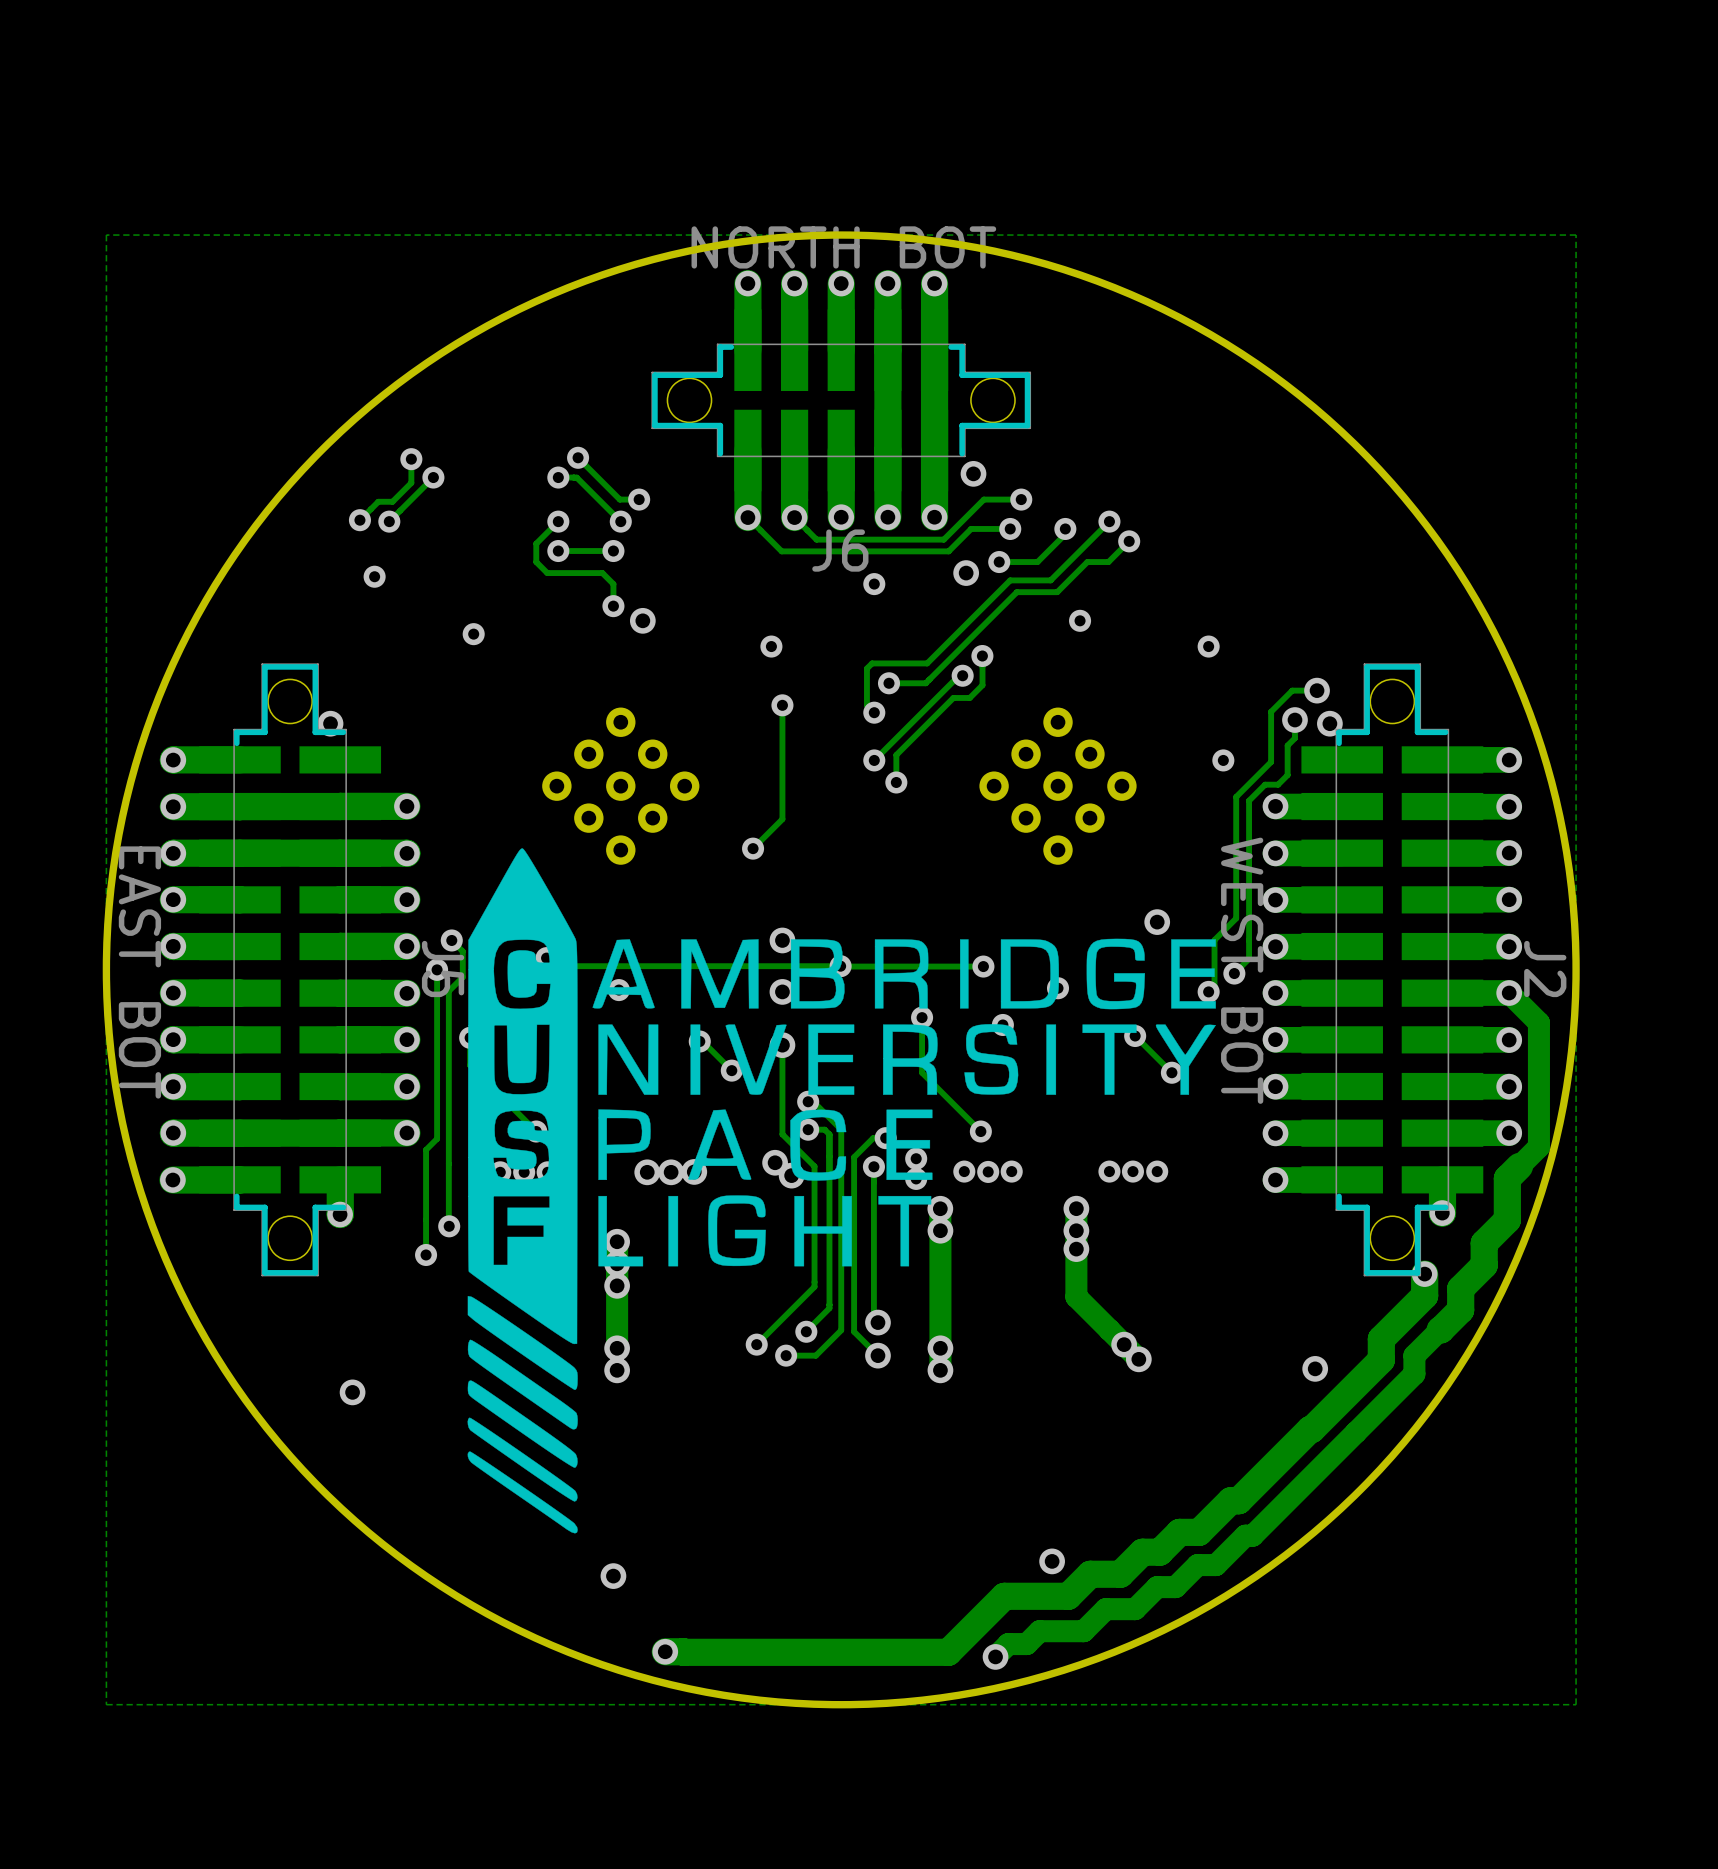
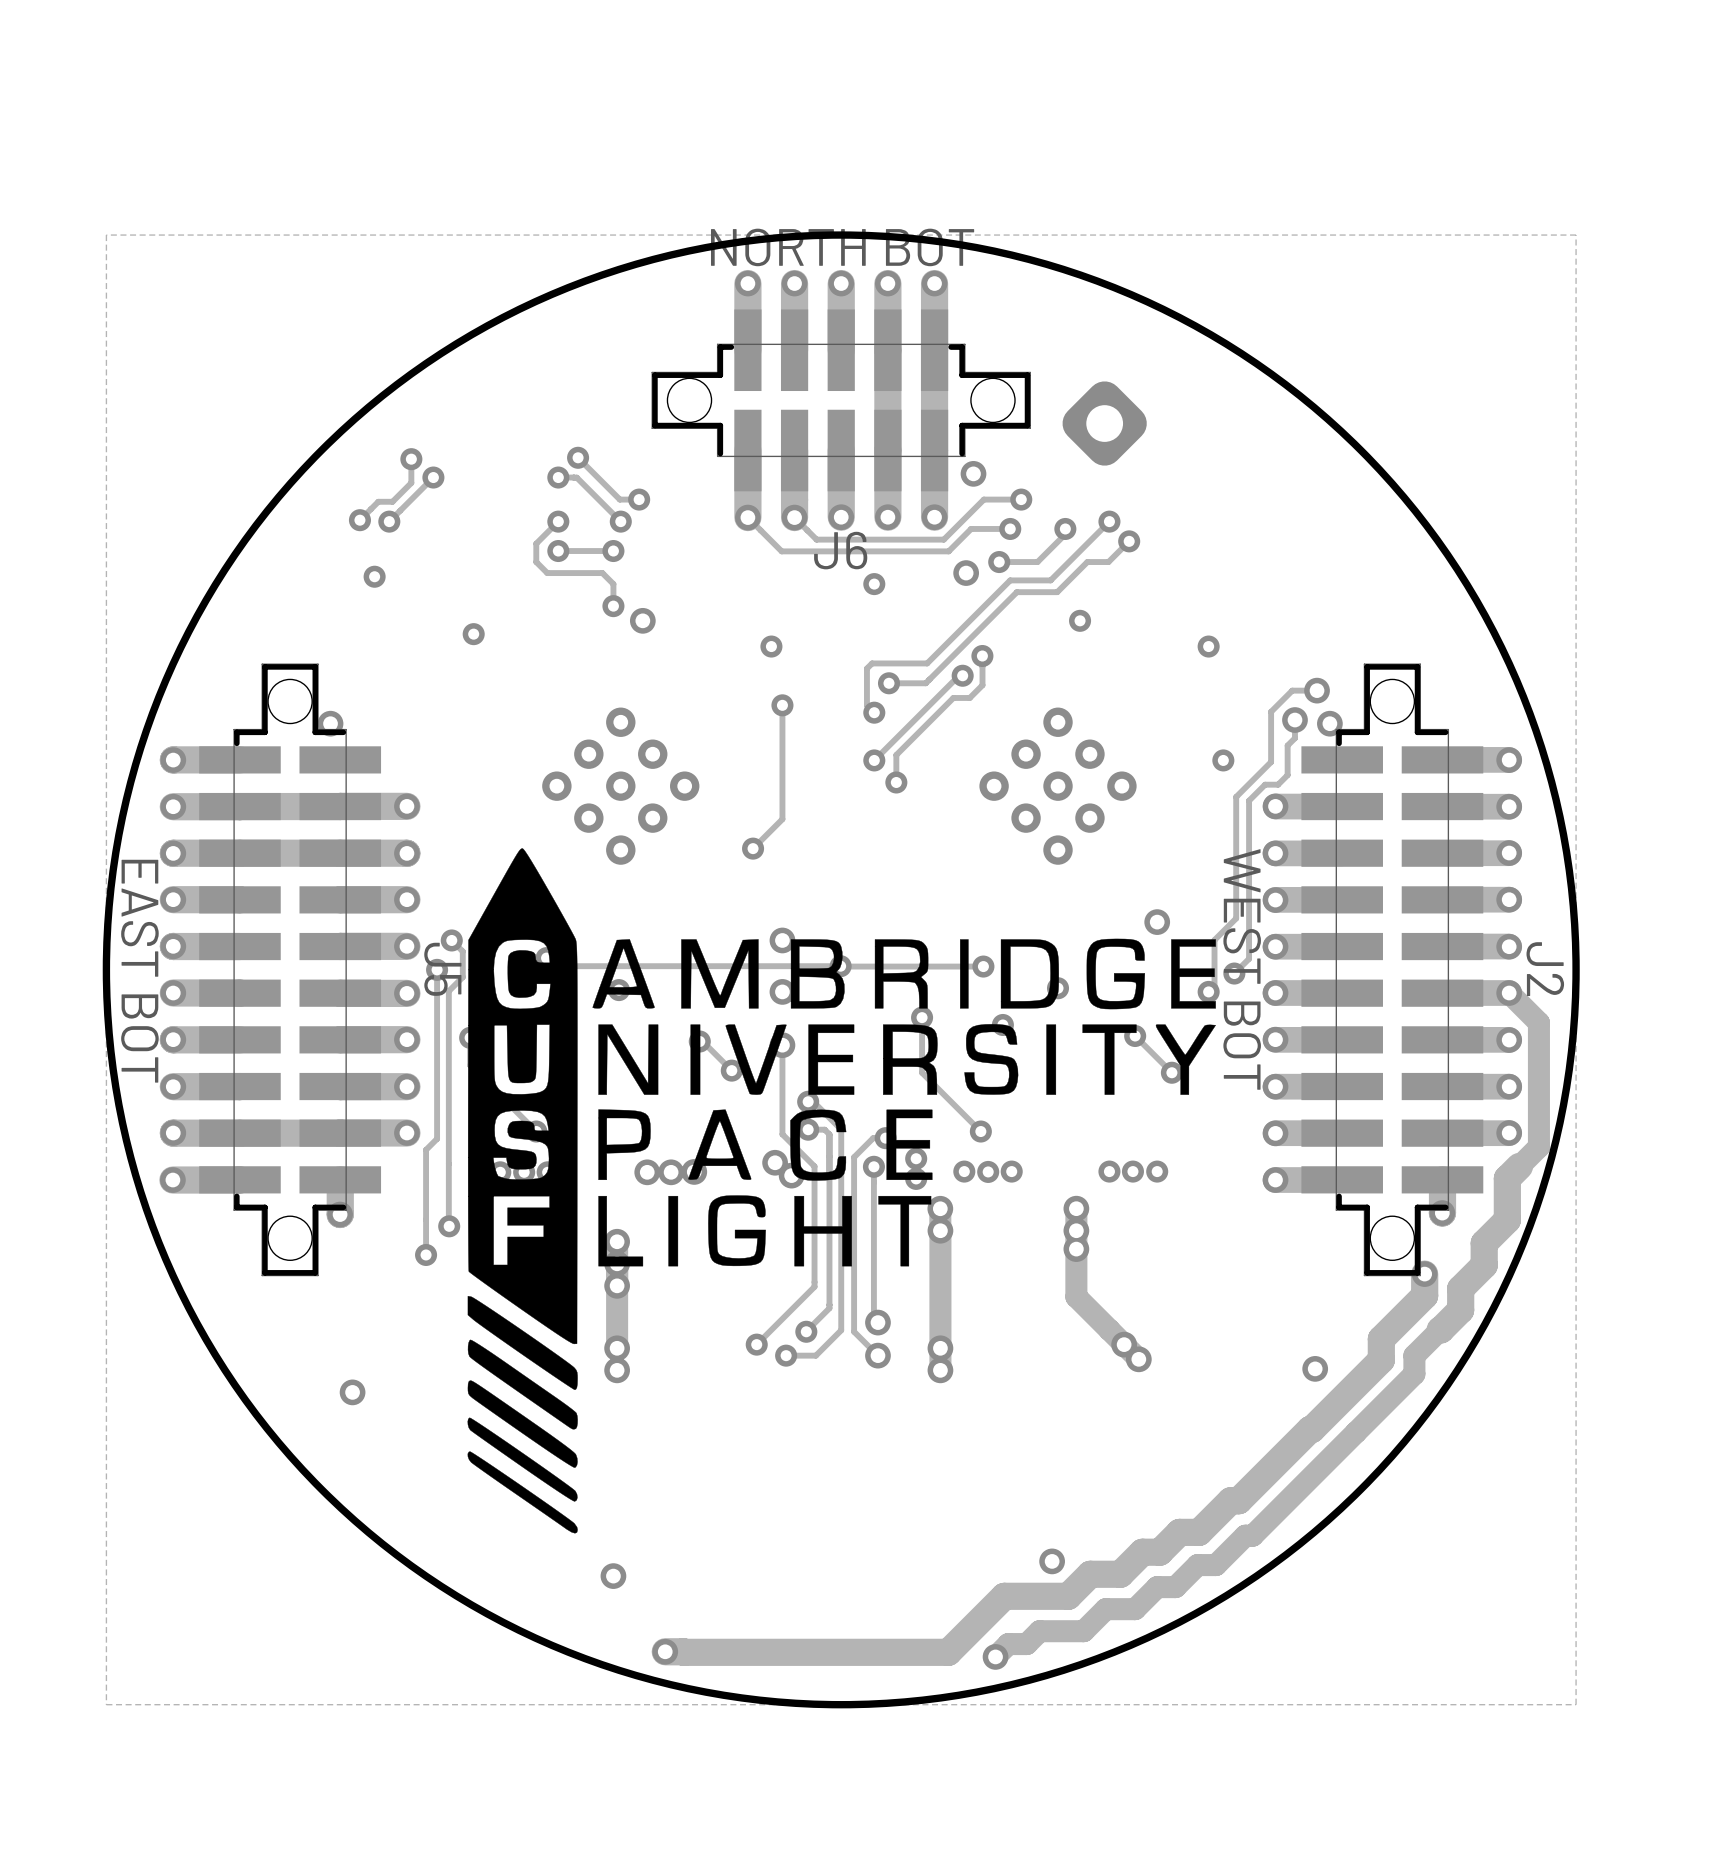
part: none -> (1104, 423)

